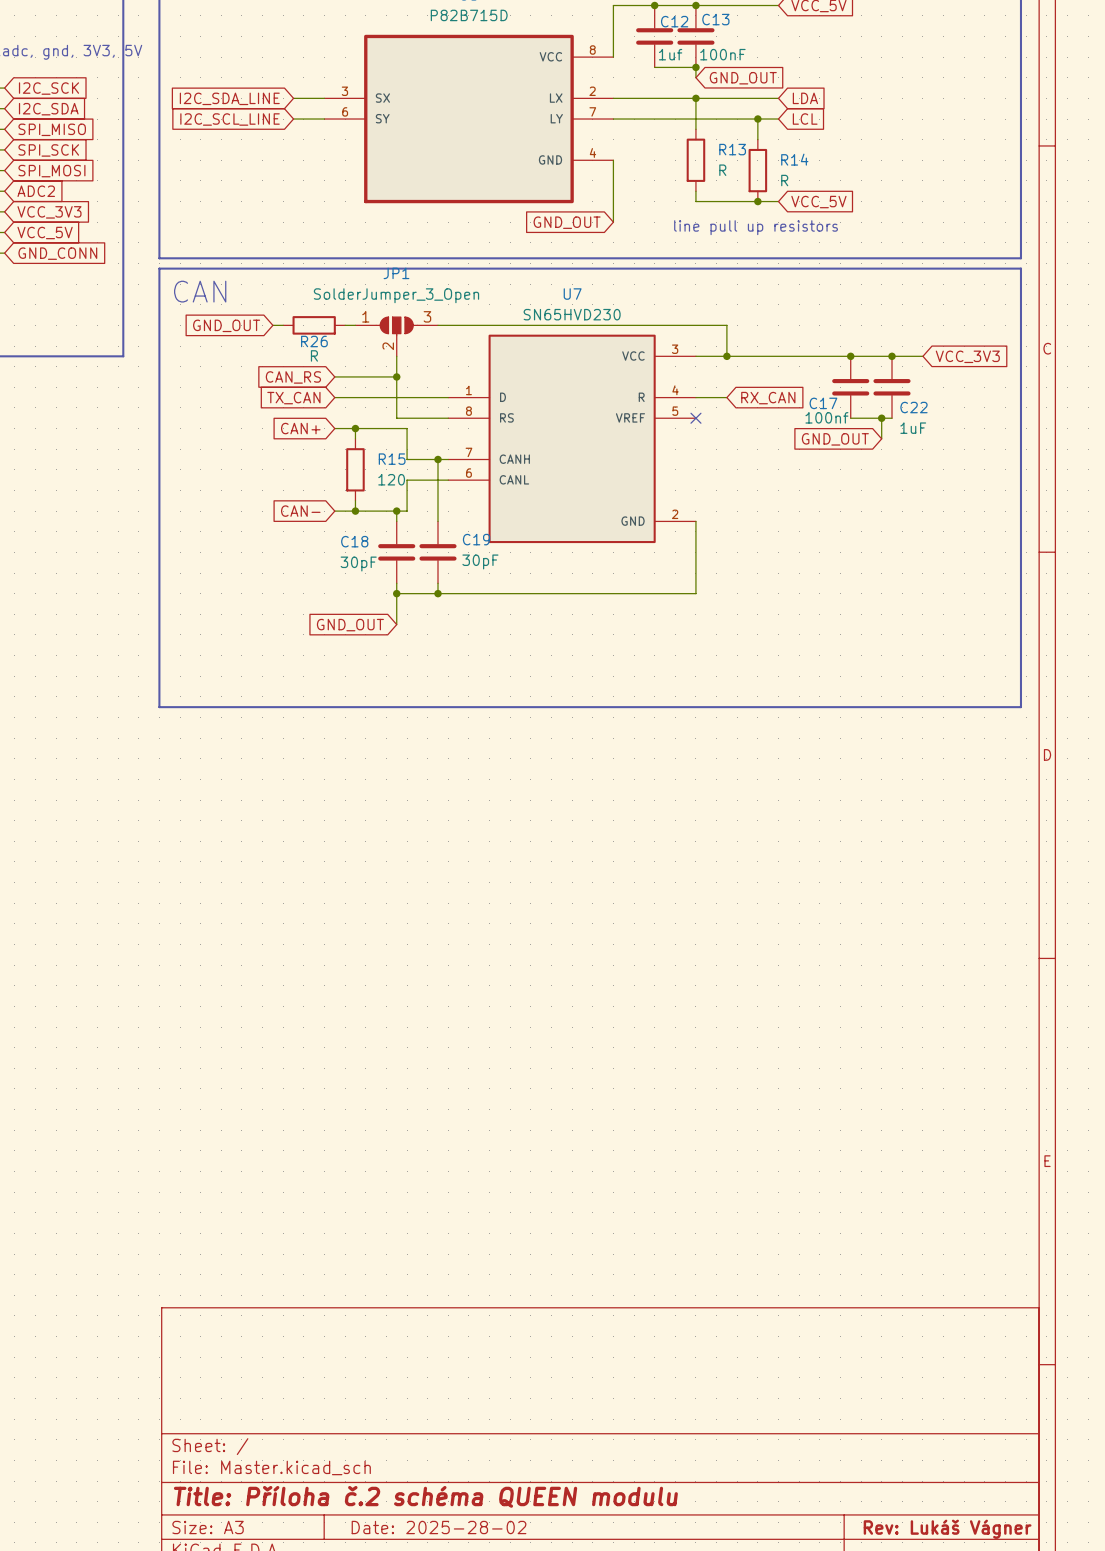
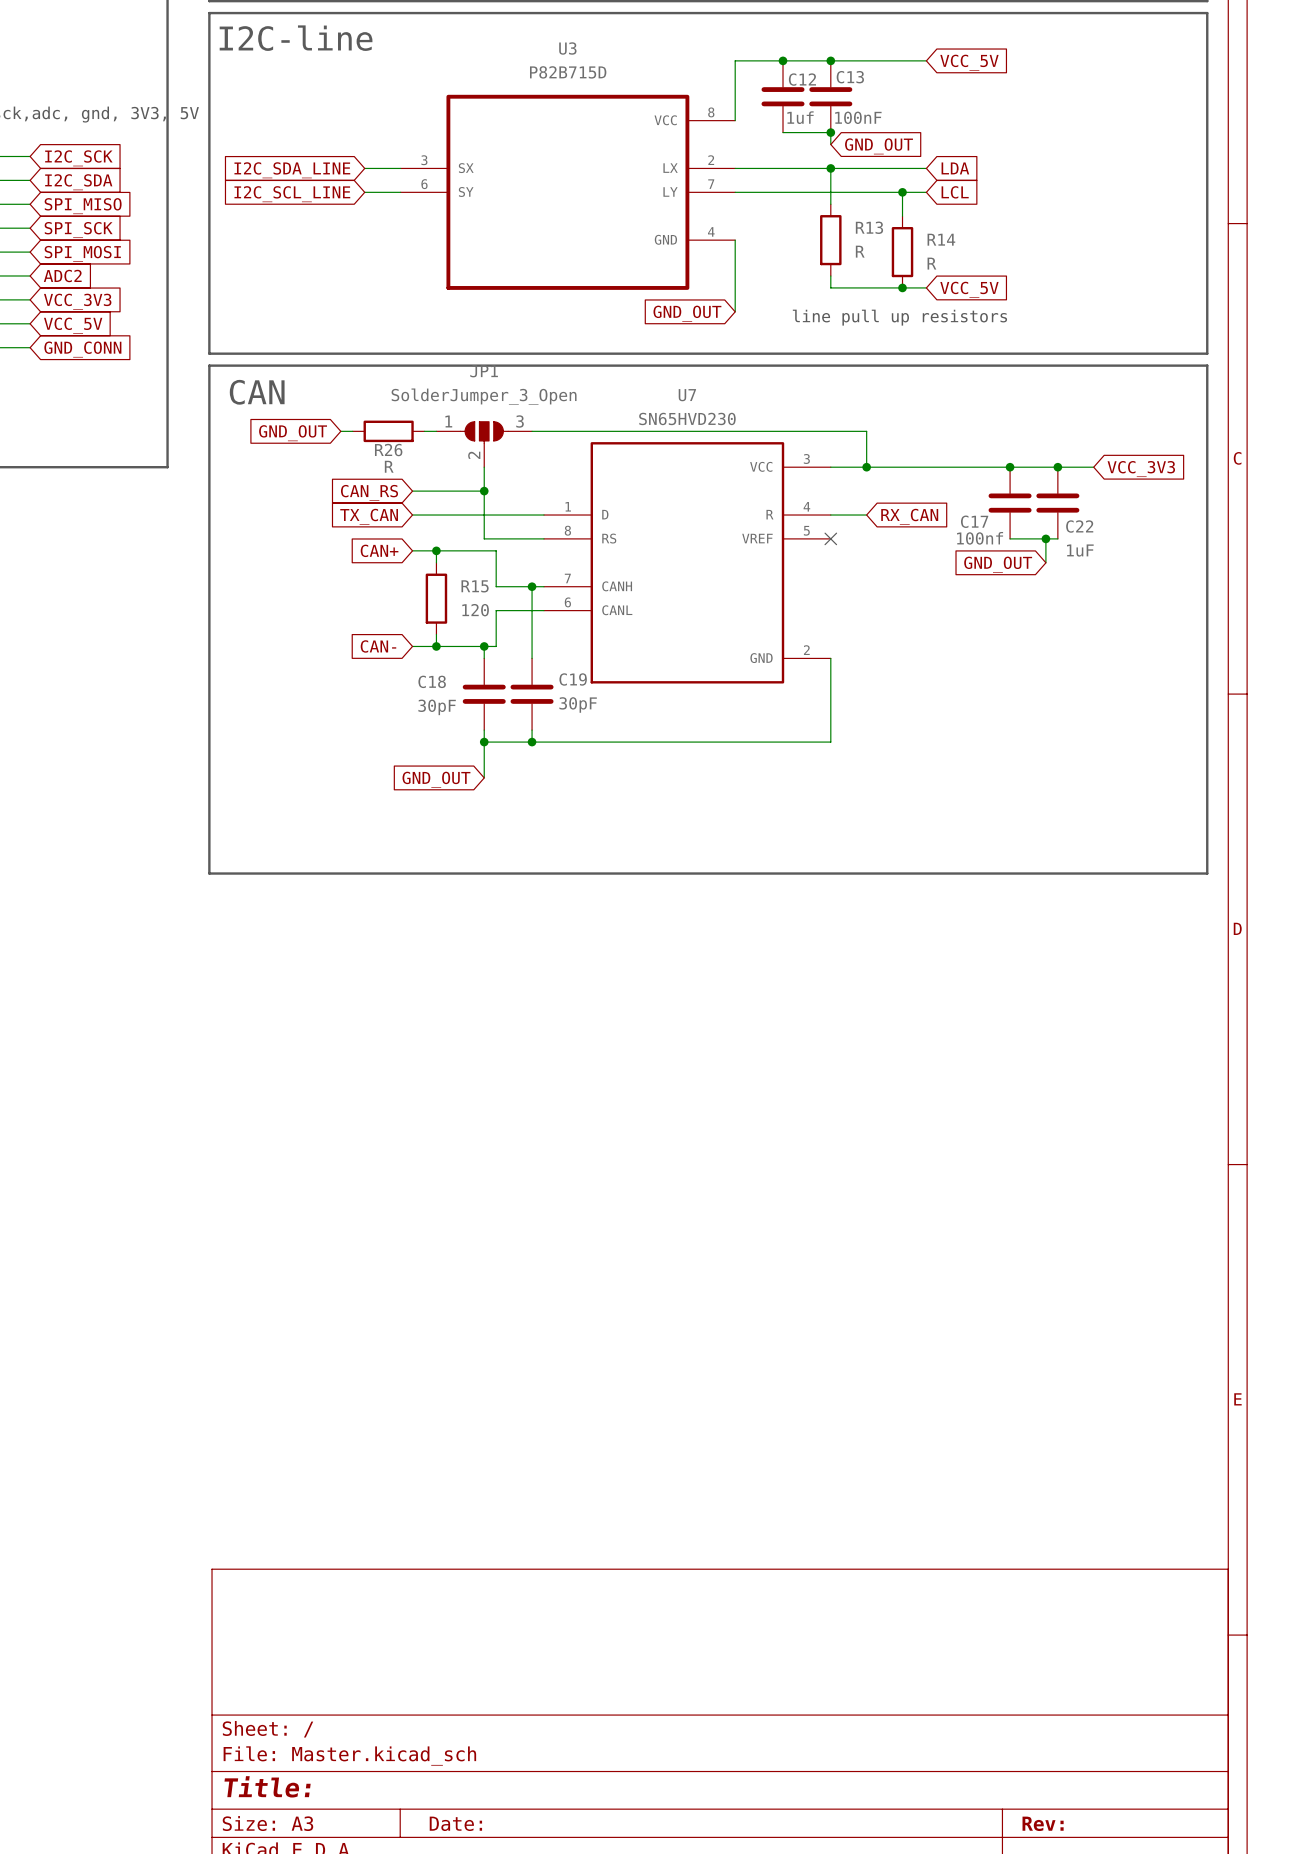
title block: Title: Příloha č.2 schéma QUEEN modulu (425, 1496) -> Title: (267, 1786)
title block: Date: 2025-28-02 (439, 1527) -> Date: (455, 1823)
title block: Rev: Lukáš Vágner (947, 1529) -> Rev: (1043, 1823)

